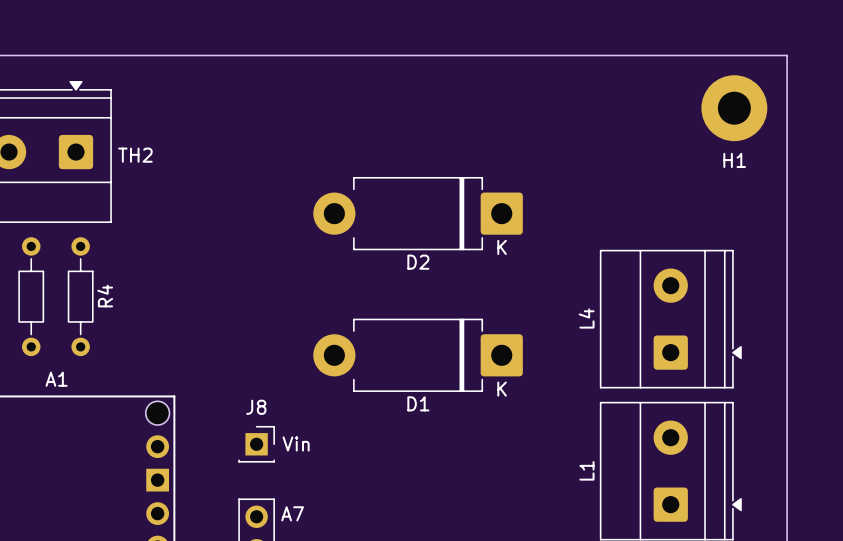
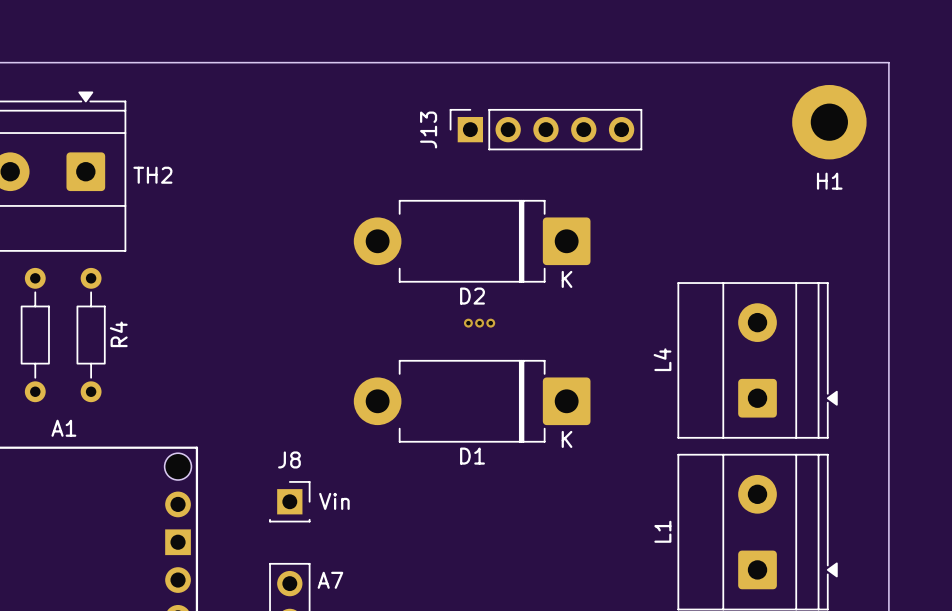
J13: none -> (545, 129)
via: none -> (468, 323)
via: none -> (479, 323)
via: none -> (490, 323)

